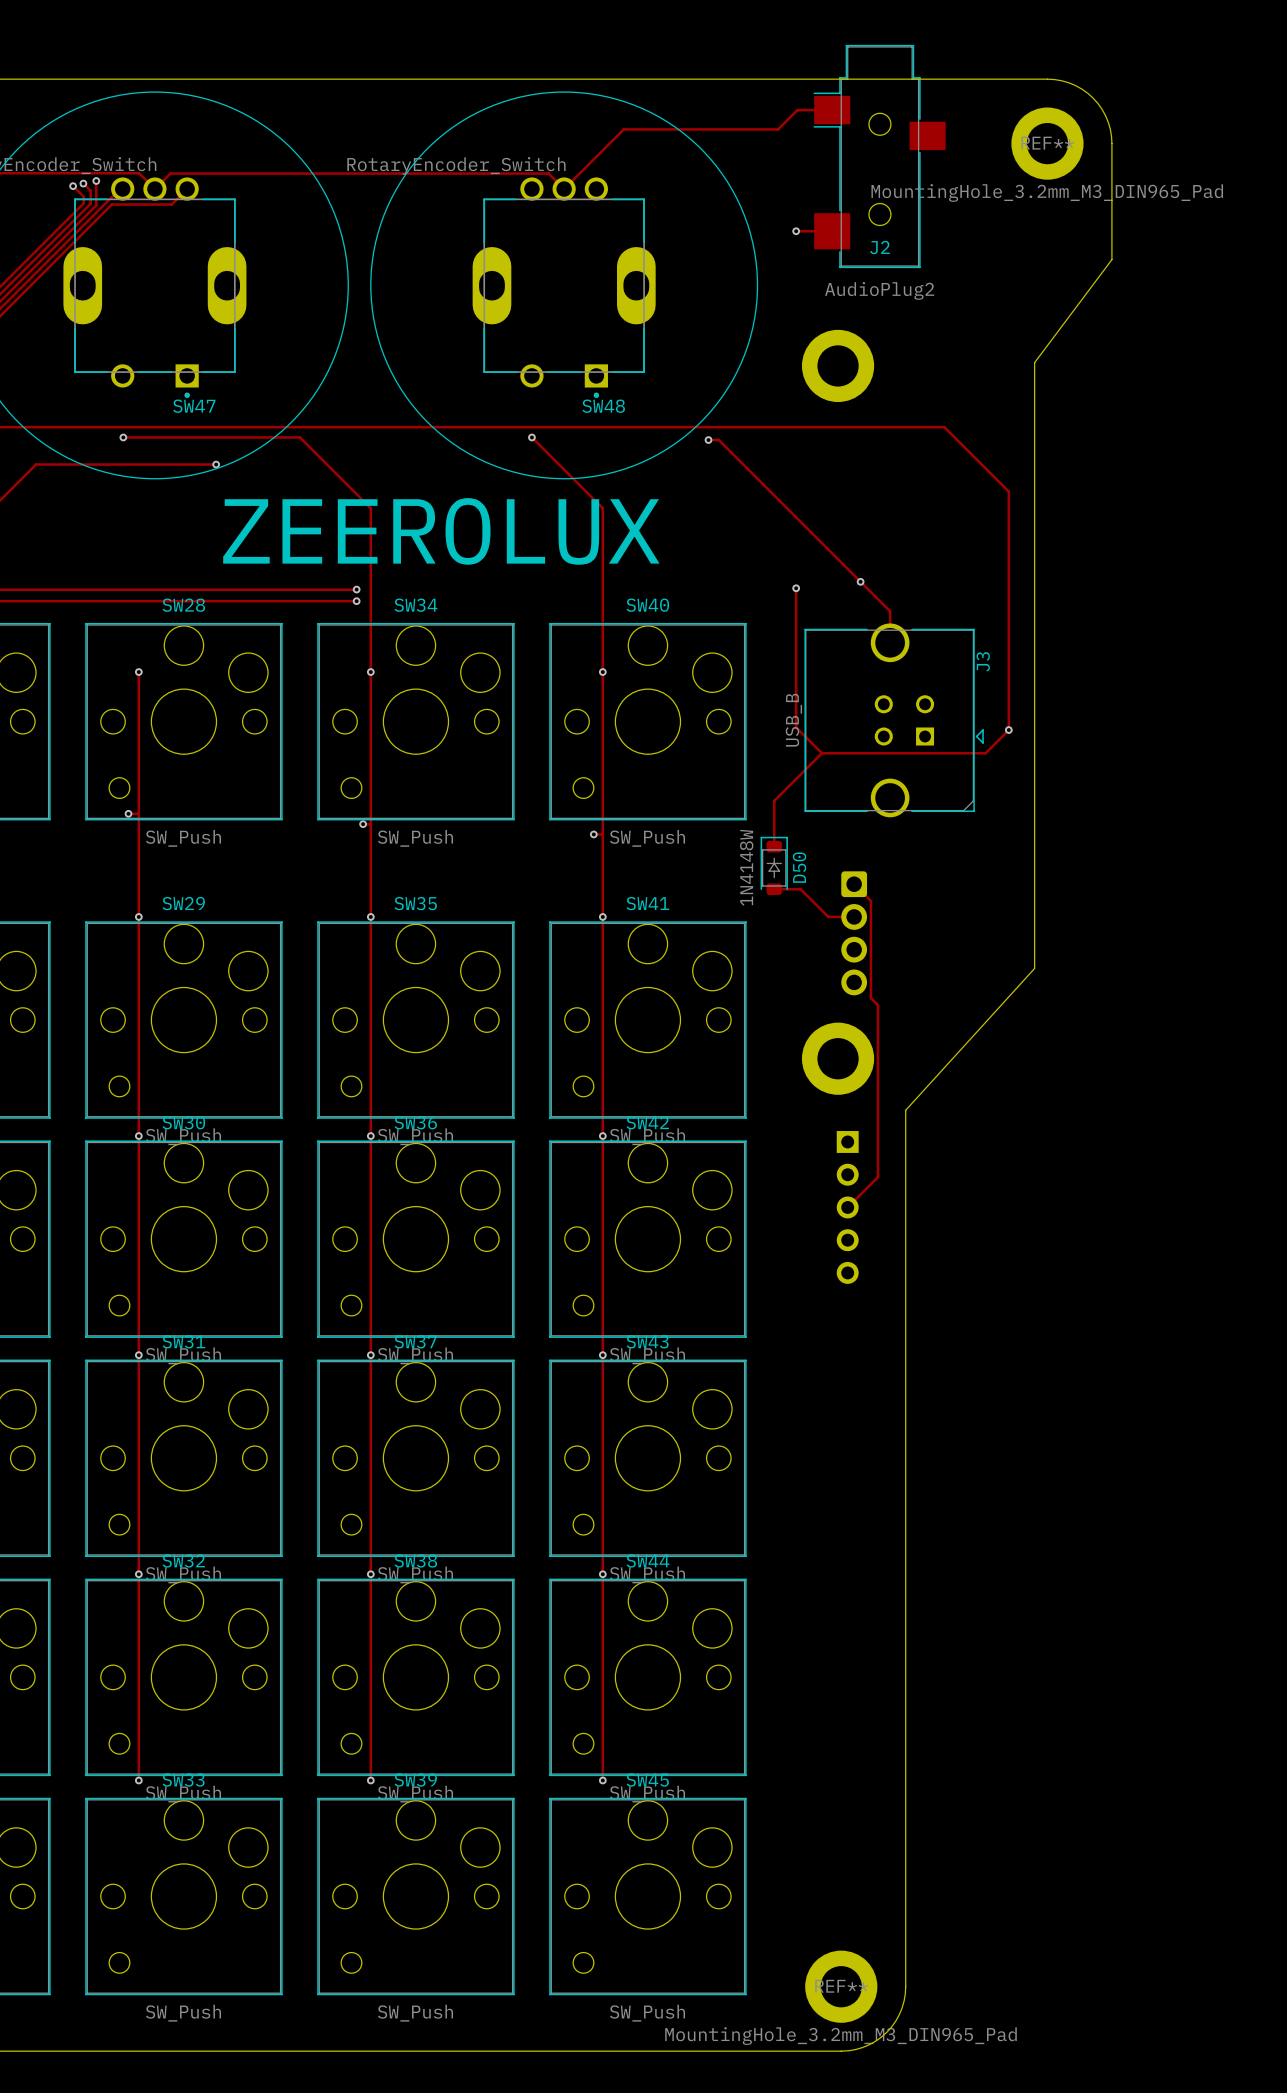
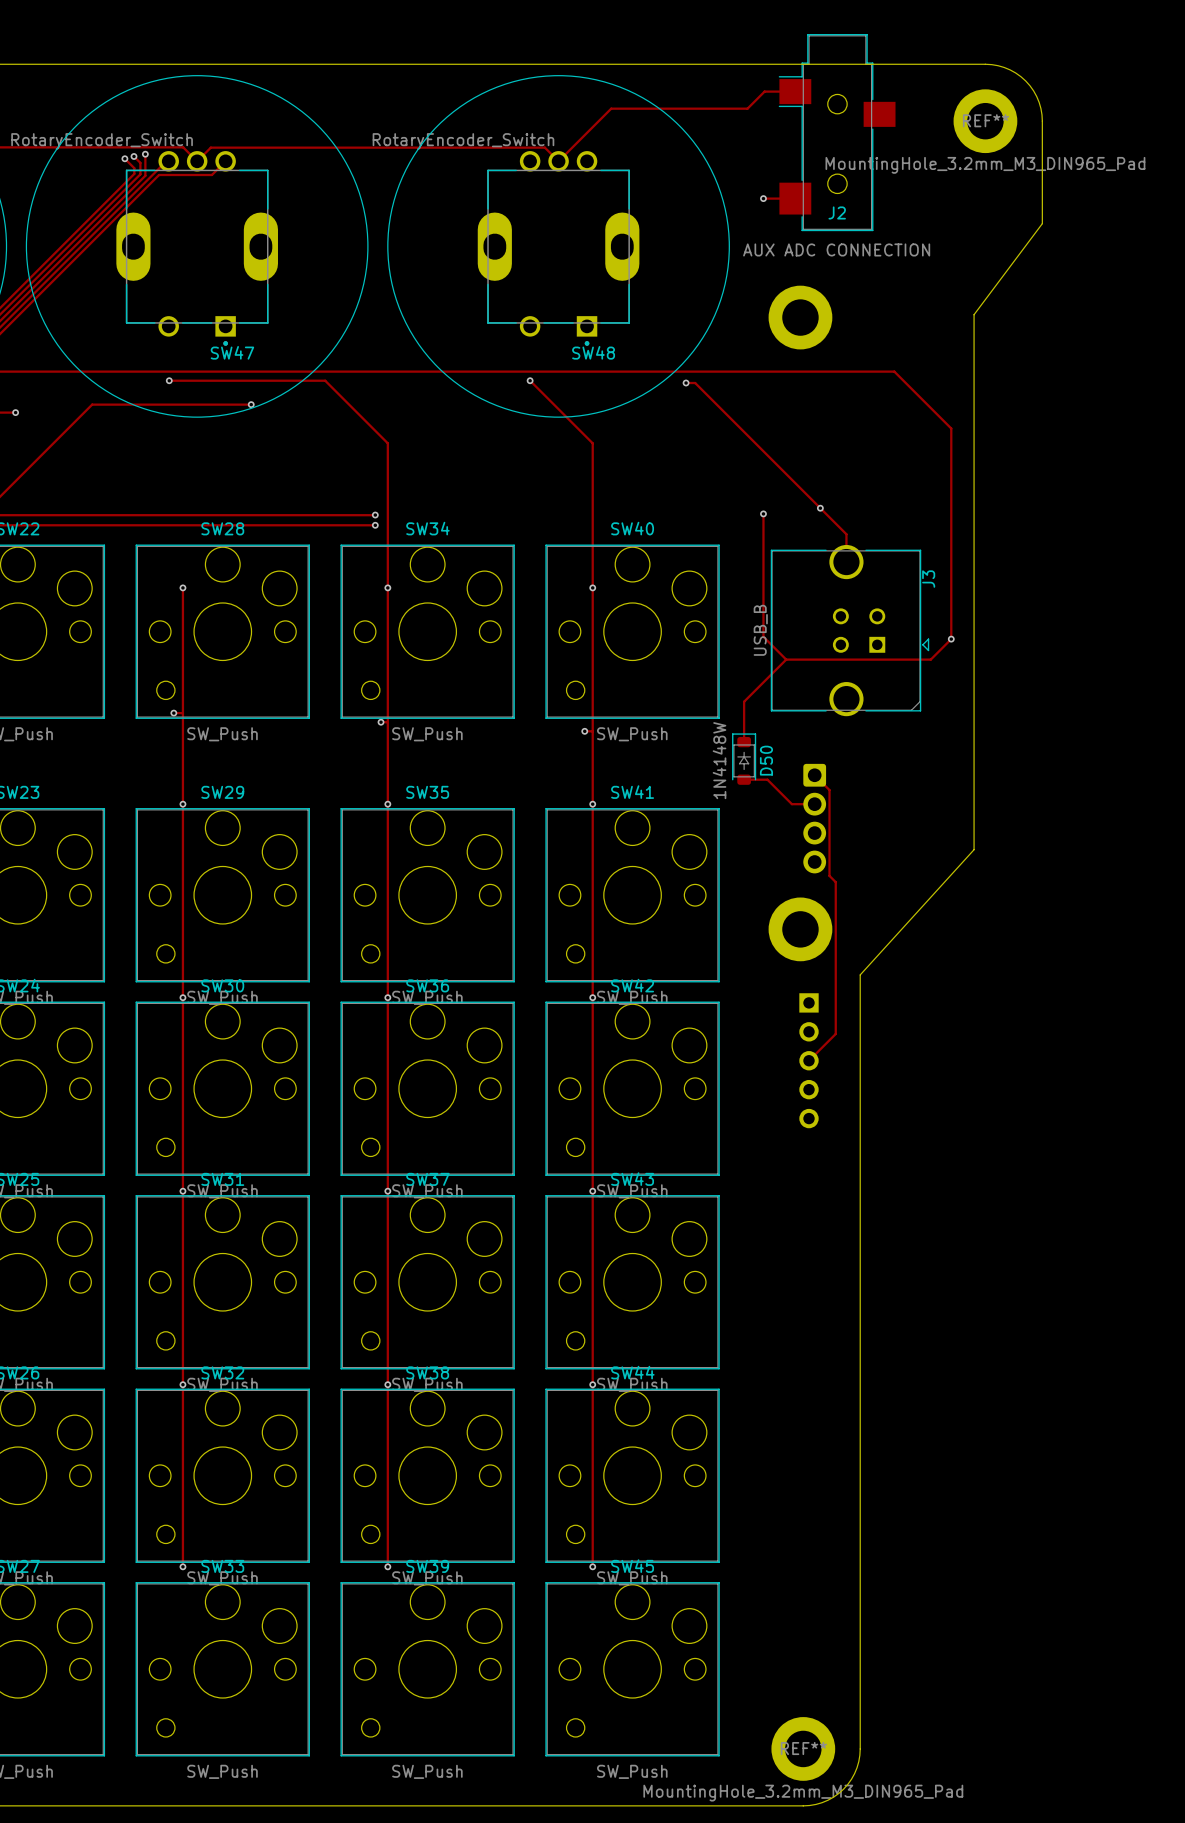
J2 value: AudioPlug2 (879, 290) -> AUX ADC CONNECTION (836, 249)
text: ZEEROLUX (441, 531) -> none

